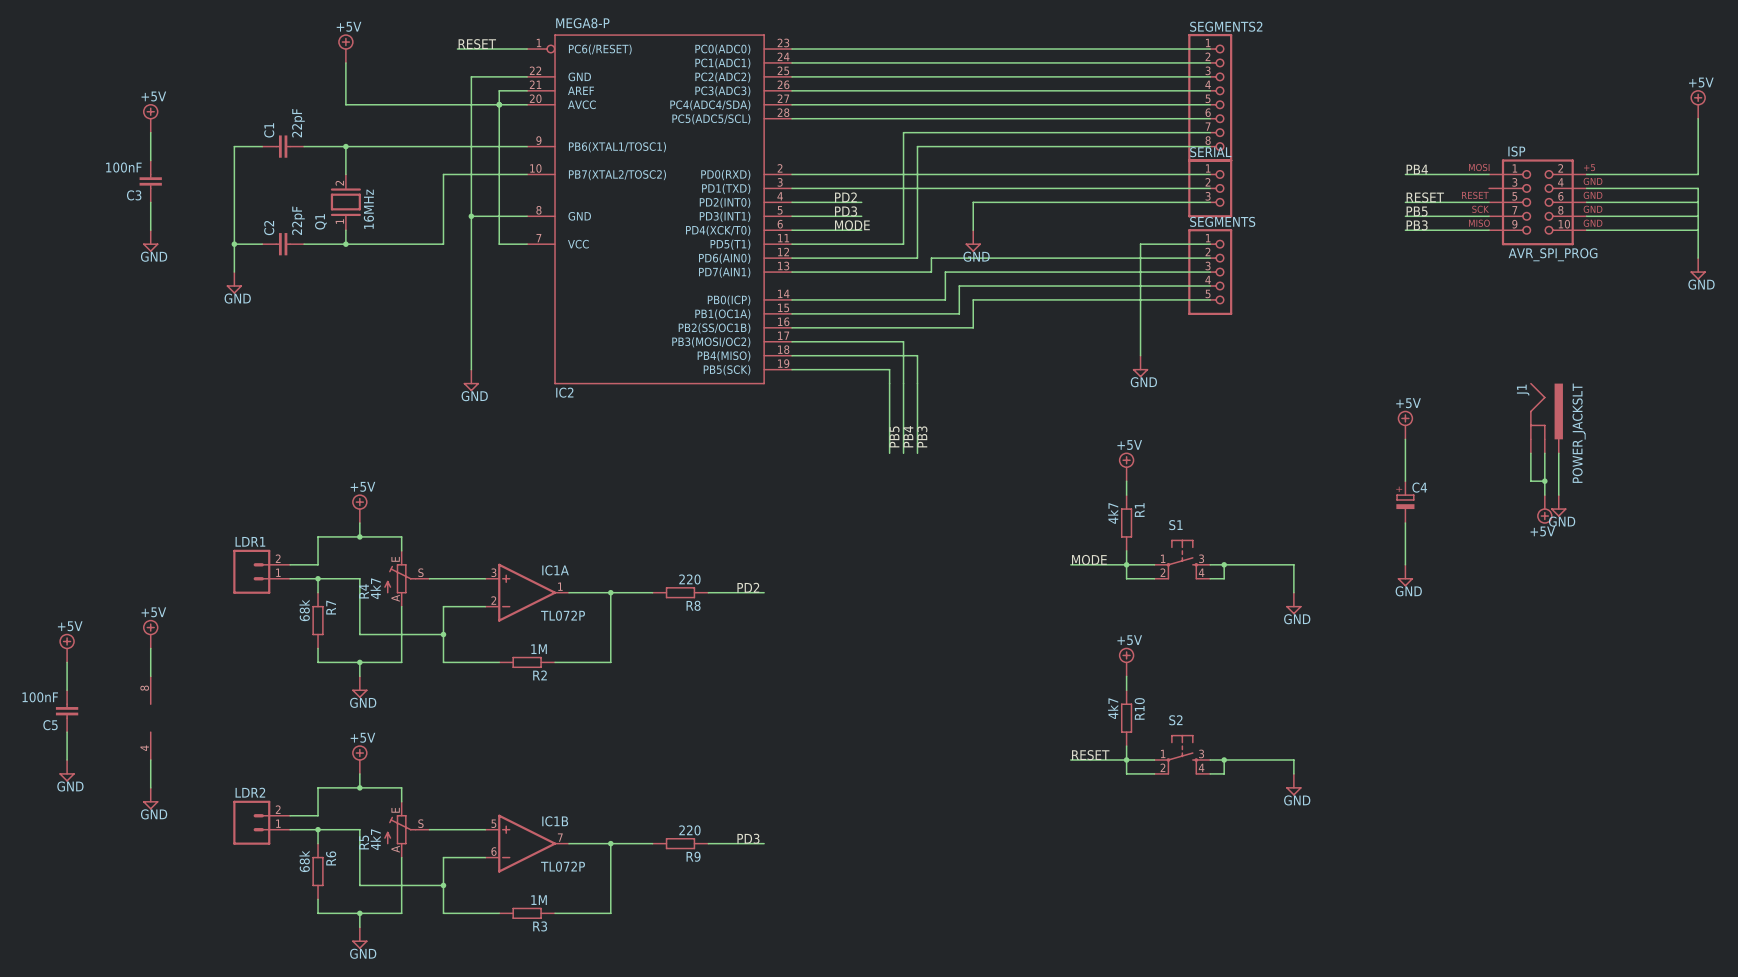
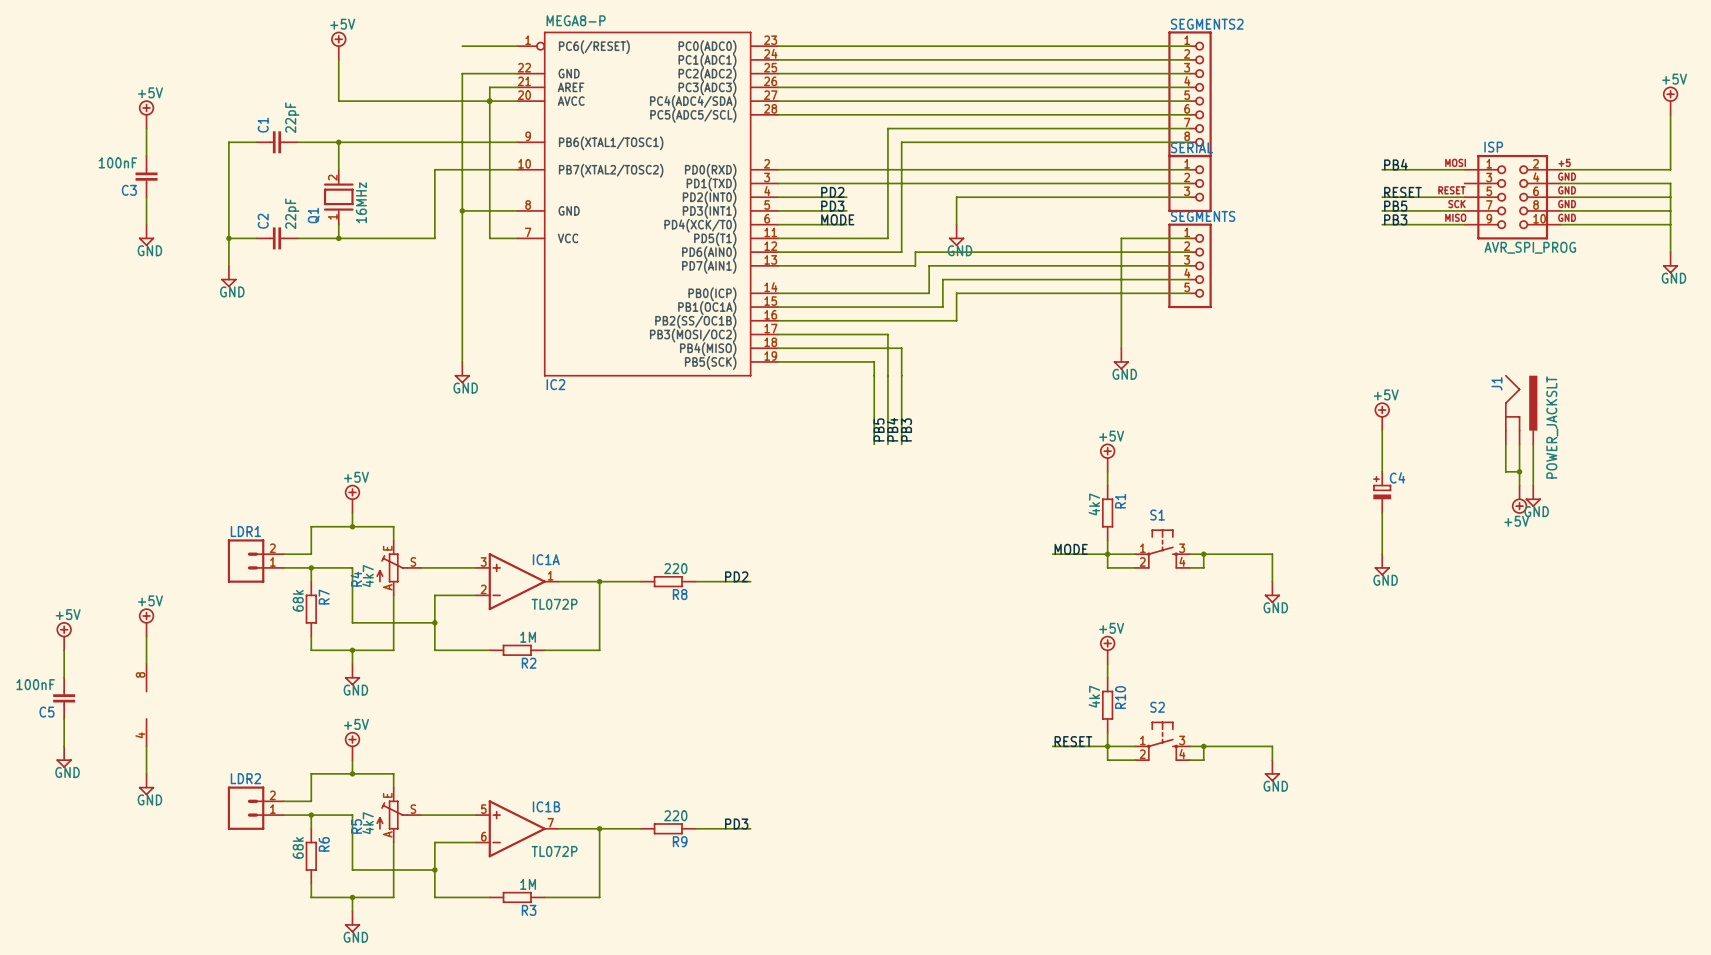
label: RESET (477, 44) -> none
wire: (457, 49) (471, 49) -> none

